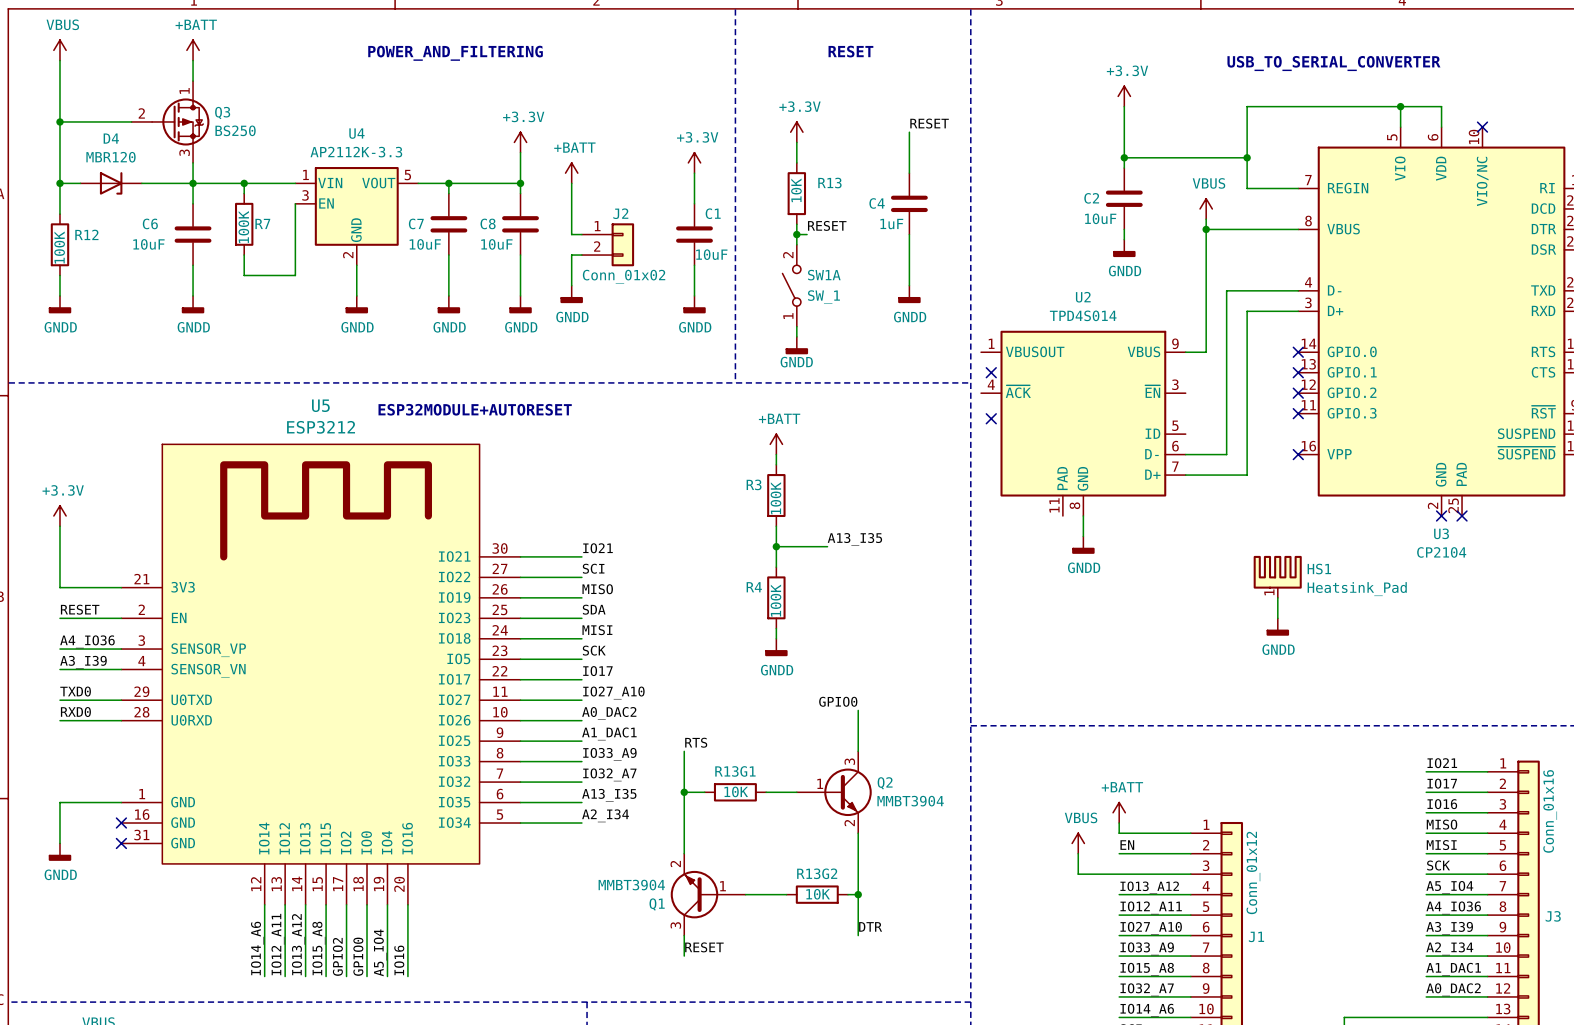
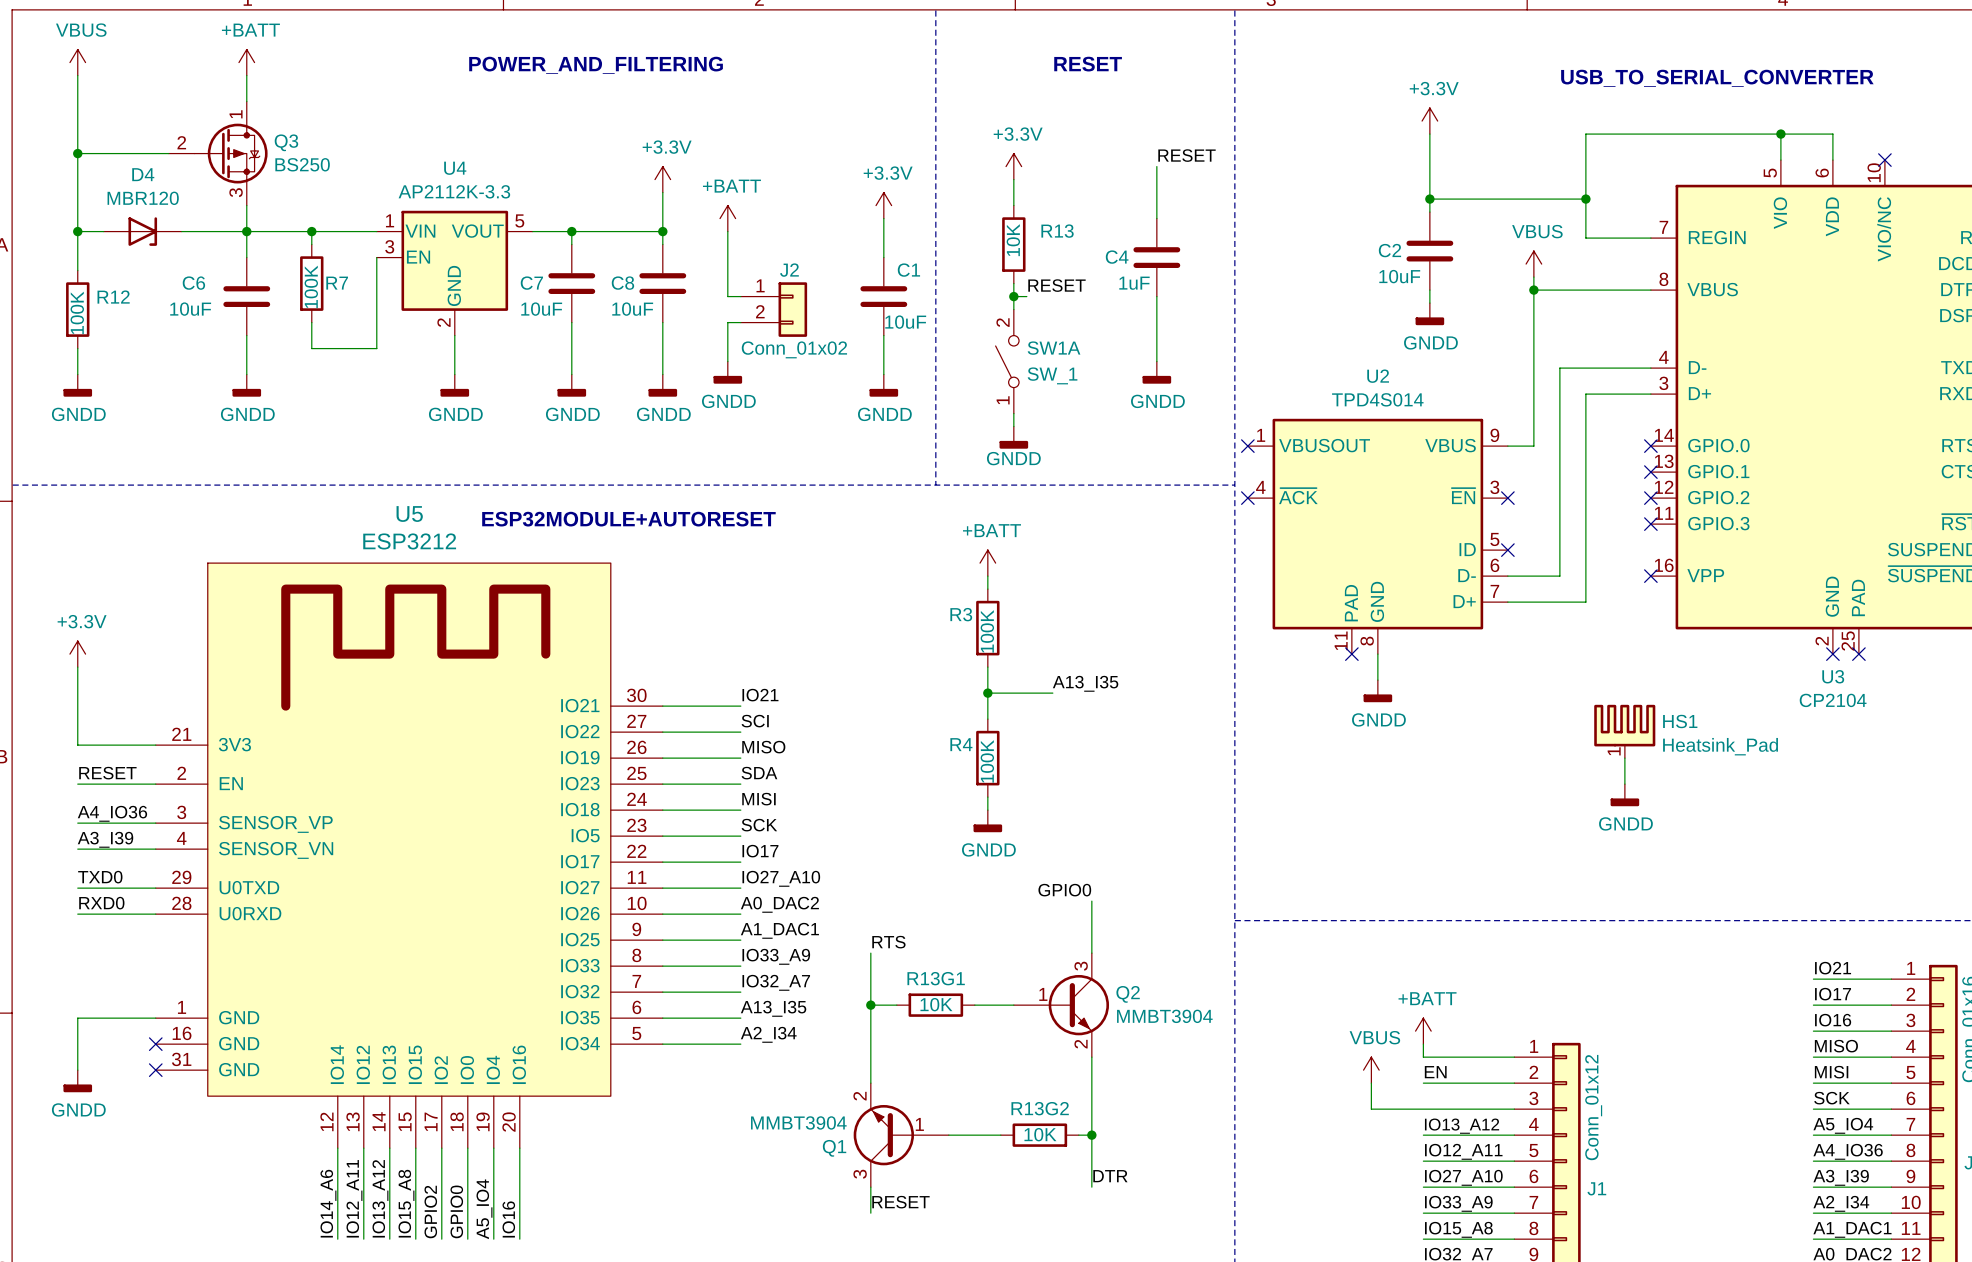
no-connect mark: none -> (1247, 446)
no-connect mark: (991, 372) -> none
no-connect mark: none -> (1247, 498)
no-connect mark: none -> (1507, 498)
no-connect mark: (991, 418) -> none
no-connect mark: none -> (1507, 550)
no-connect mark: none -> (1351, 654)

